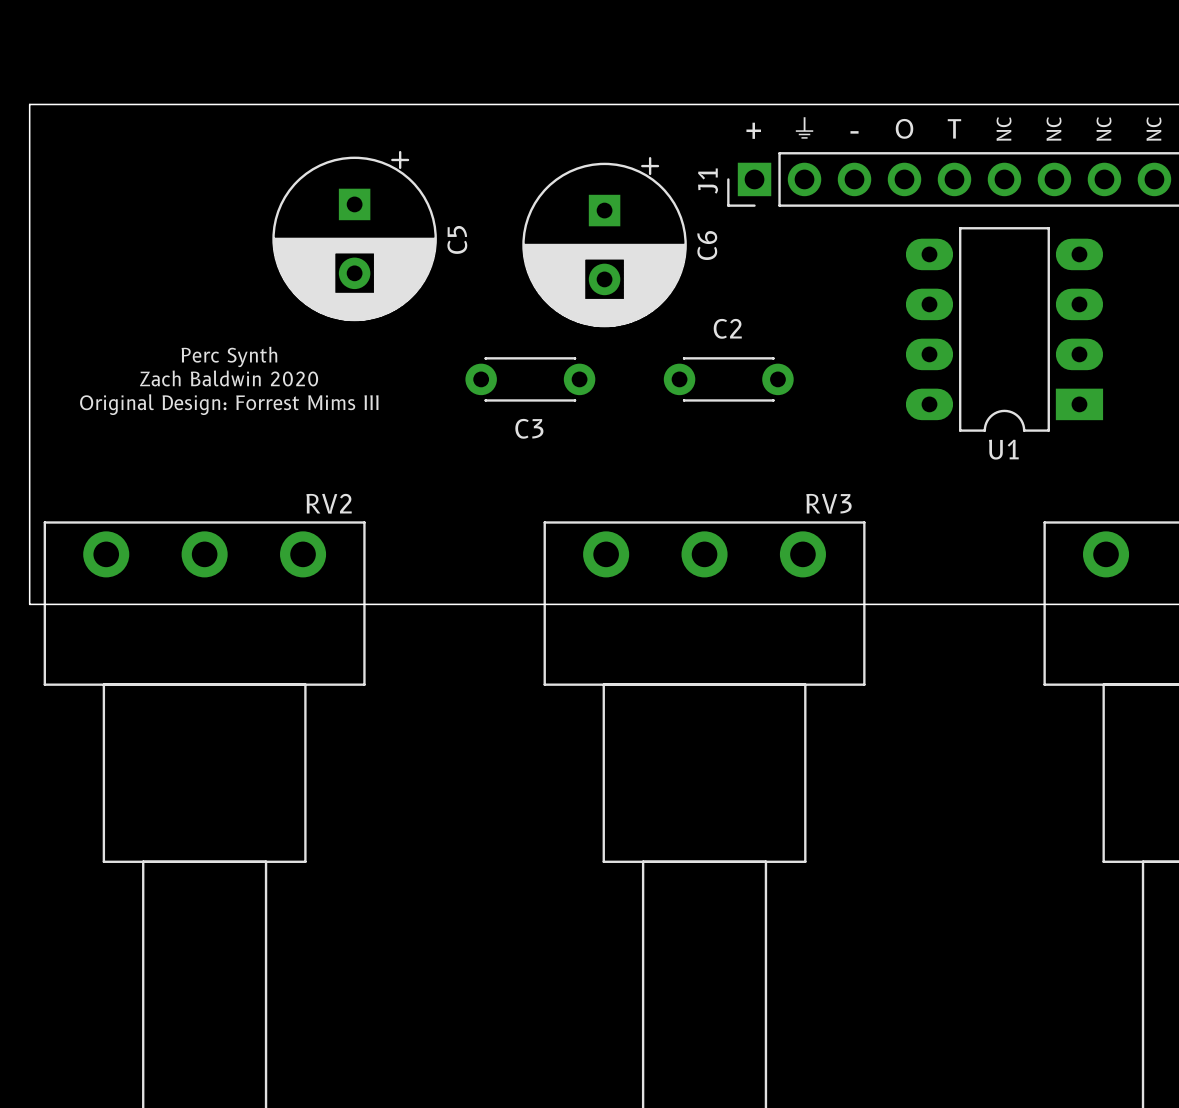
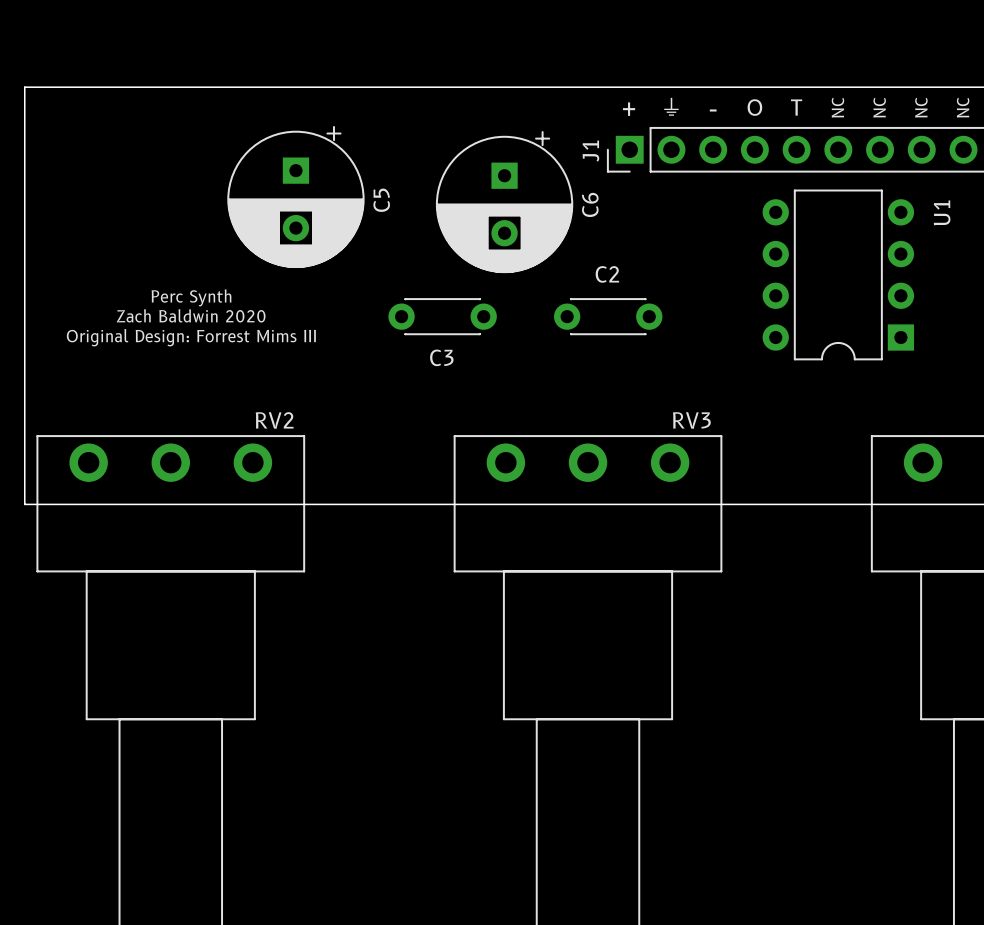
U1 footprint: [905, 227, 1104, 432] -> [762, 189, 915, 361]
U1 name position: U1 (1003, 449) -> U1 (942, 212)

